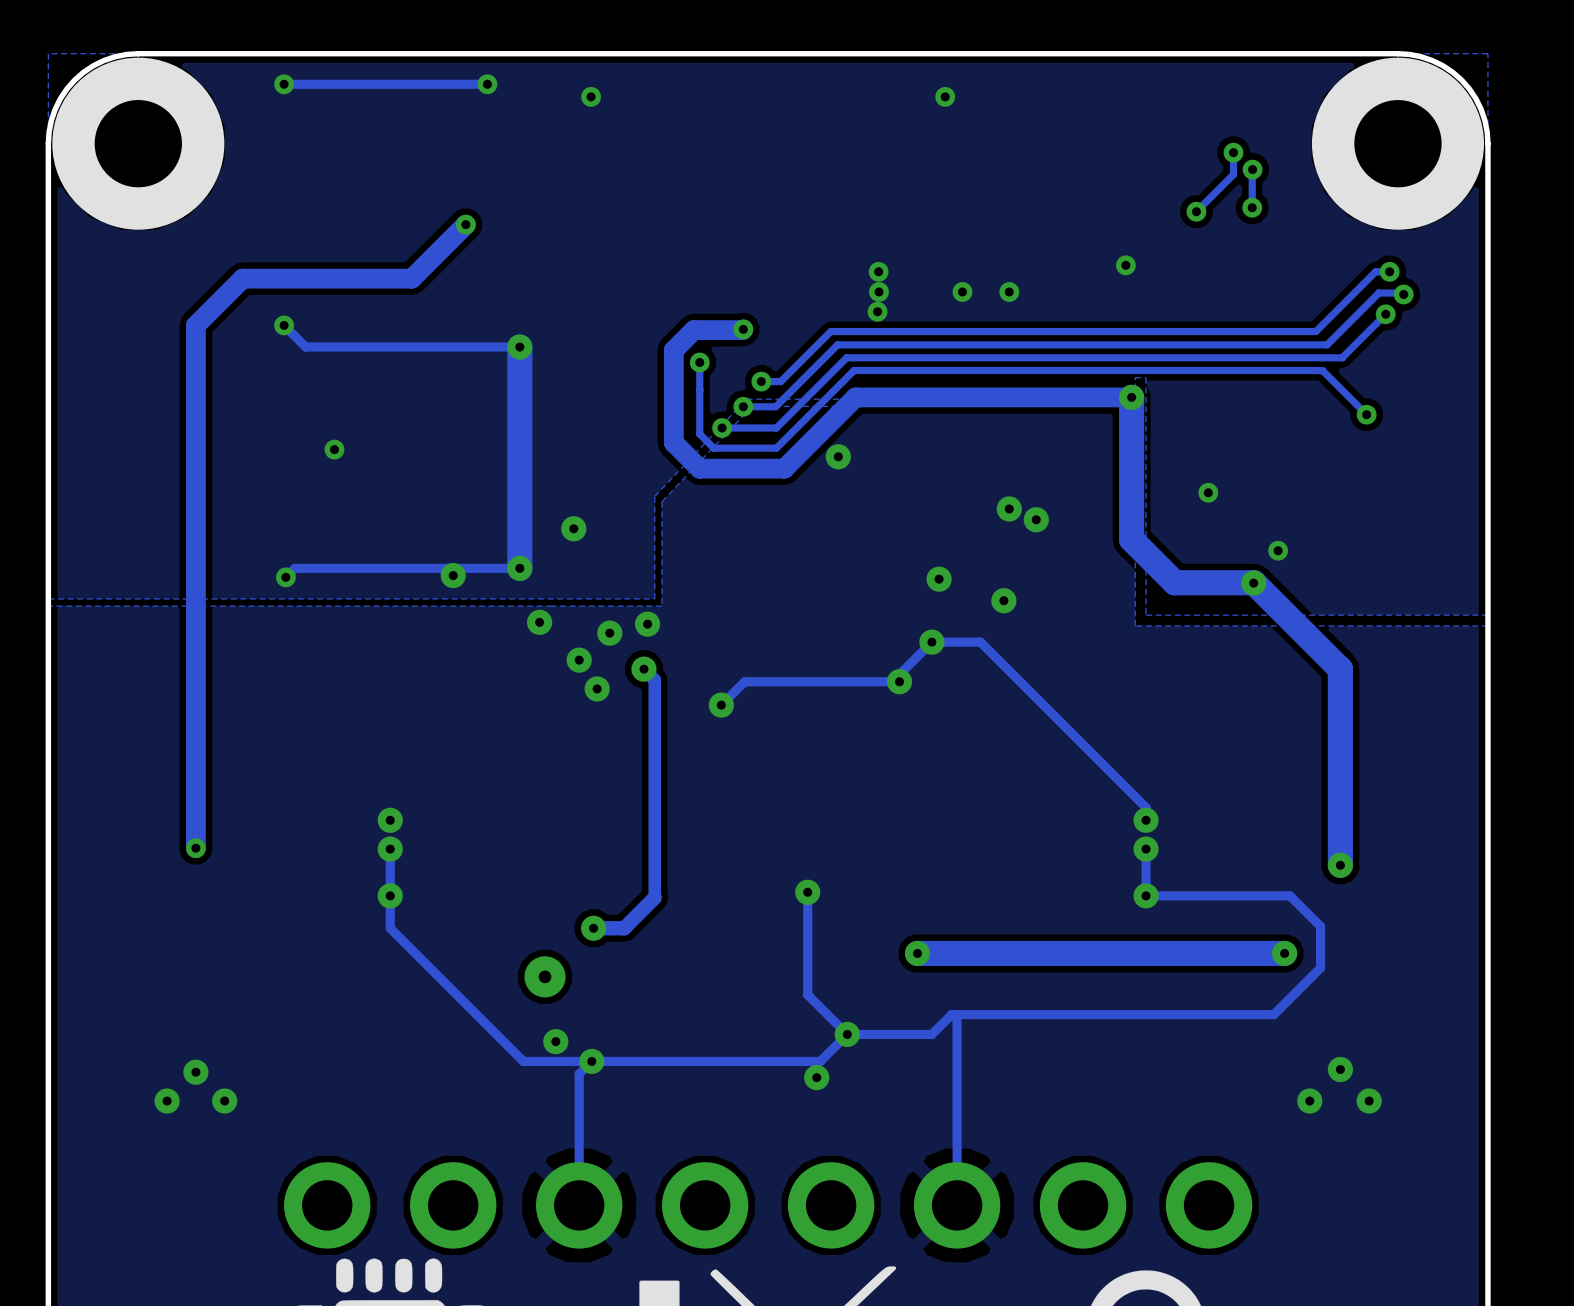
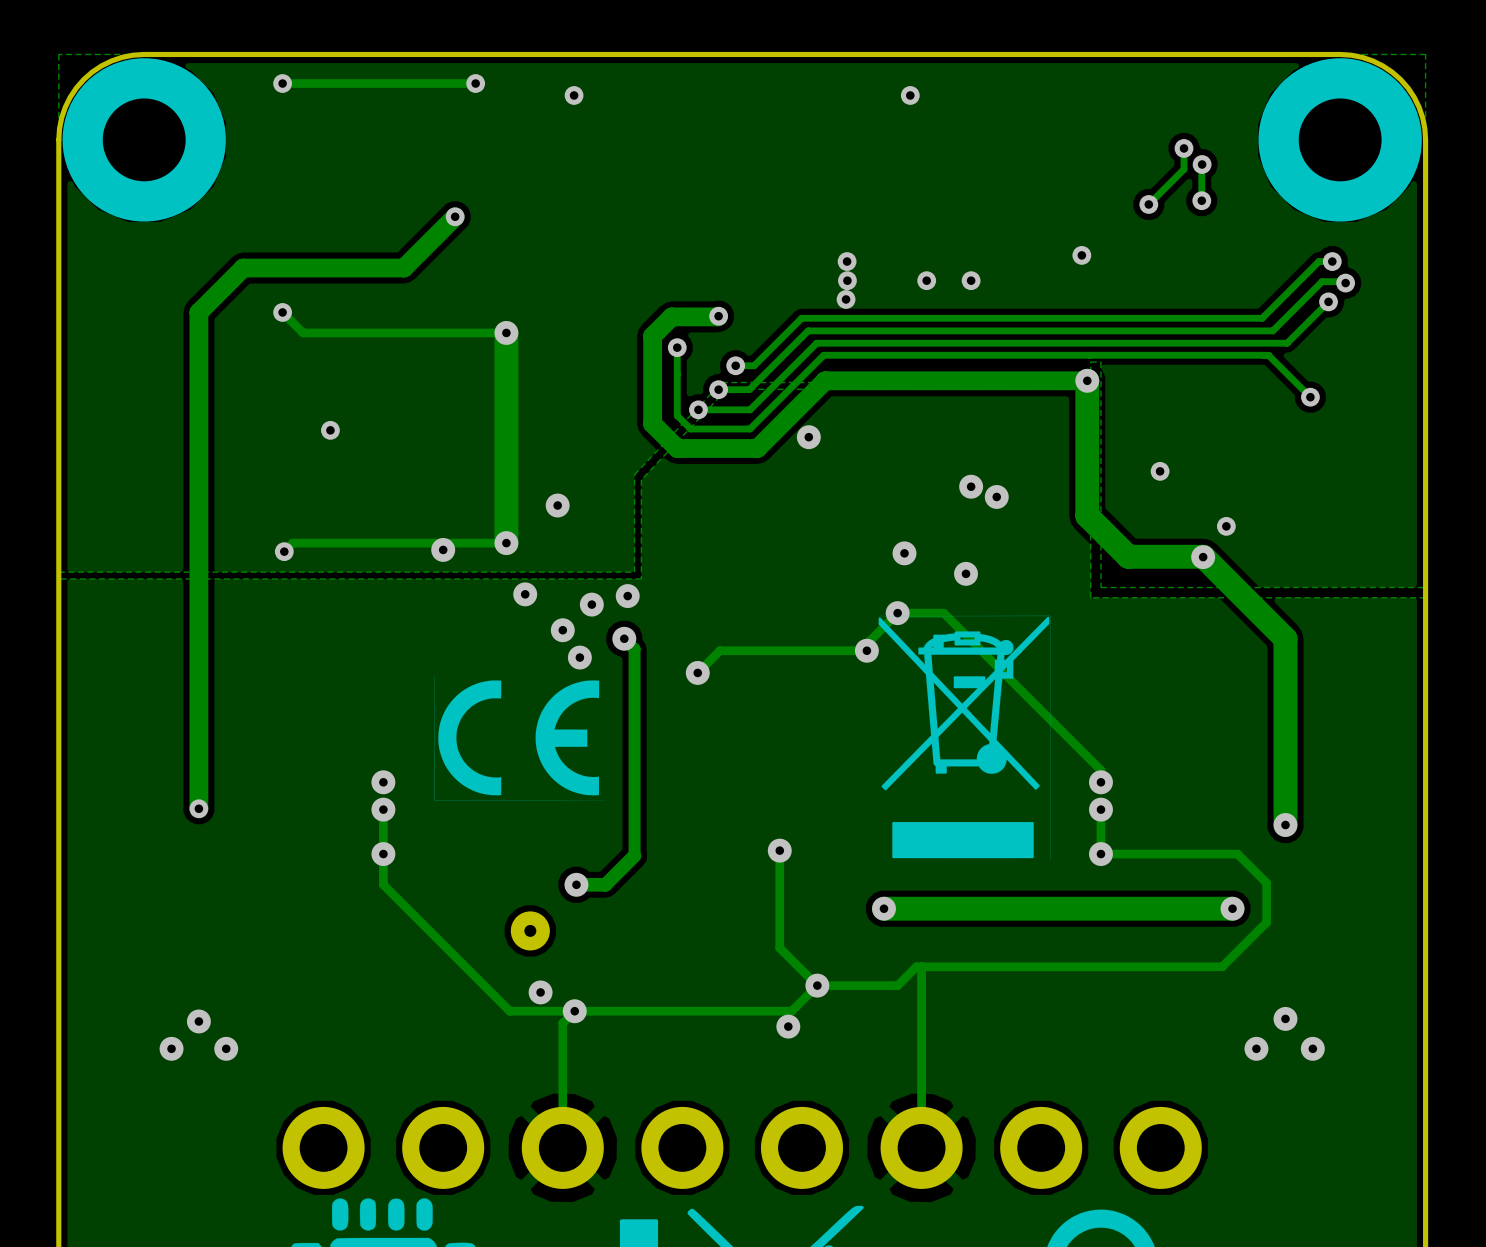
drawing: none -> [878, 615, 1051, 860]
drawing: none -> [434, 675, 606, 801]

